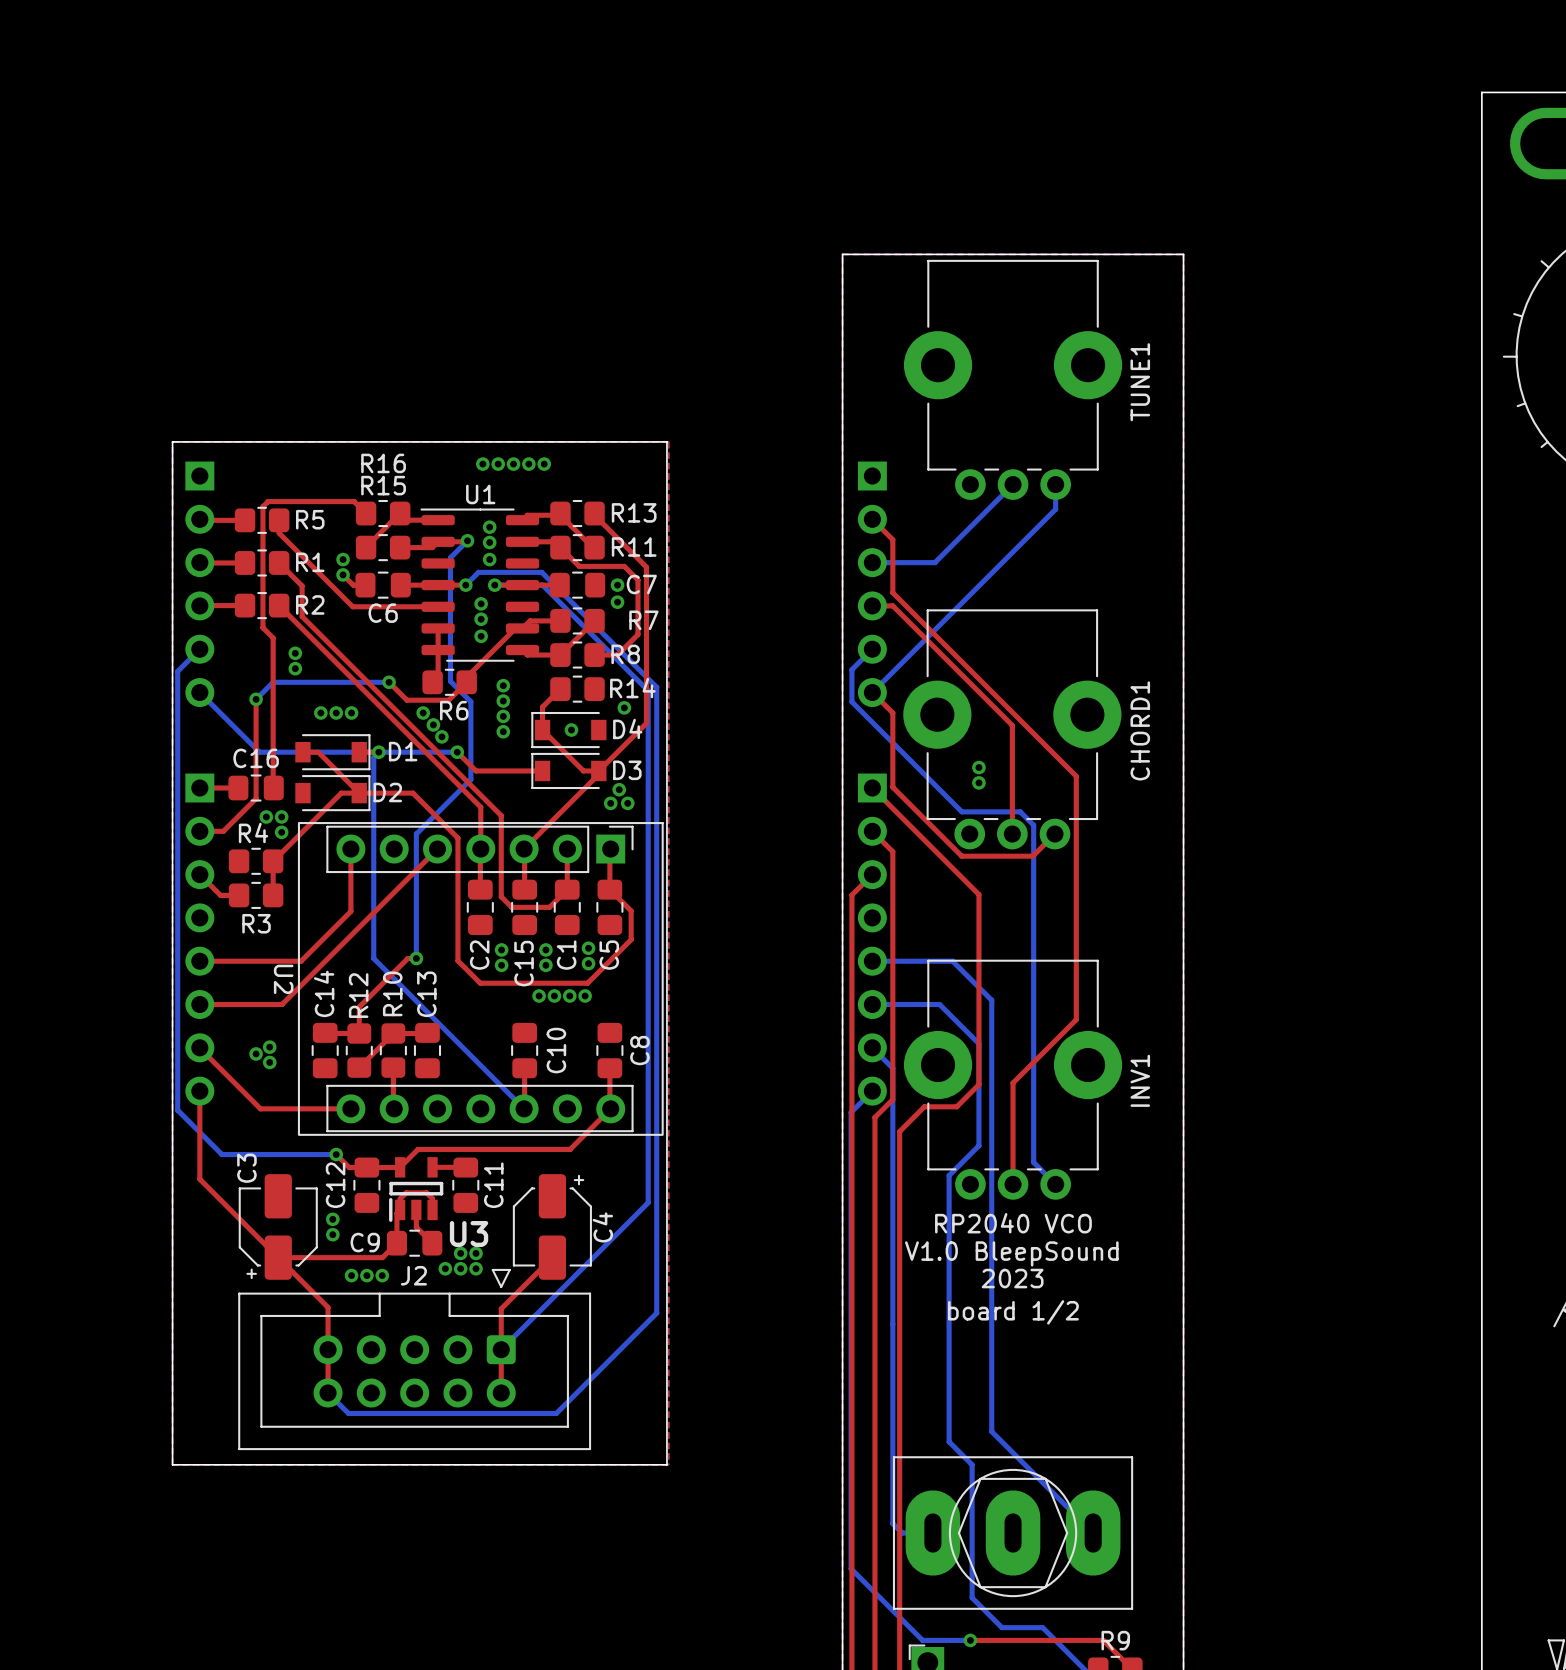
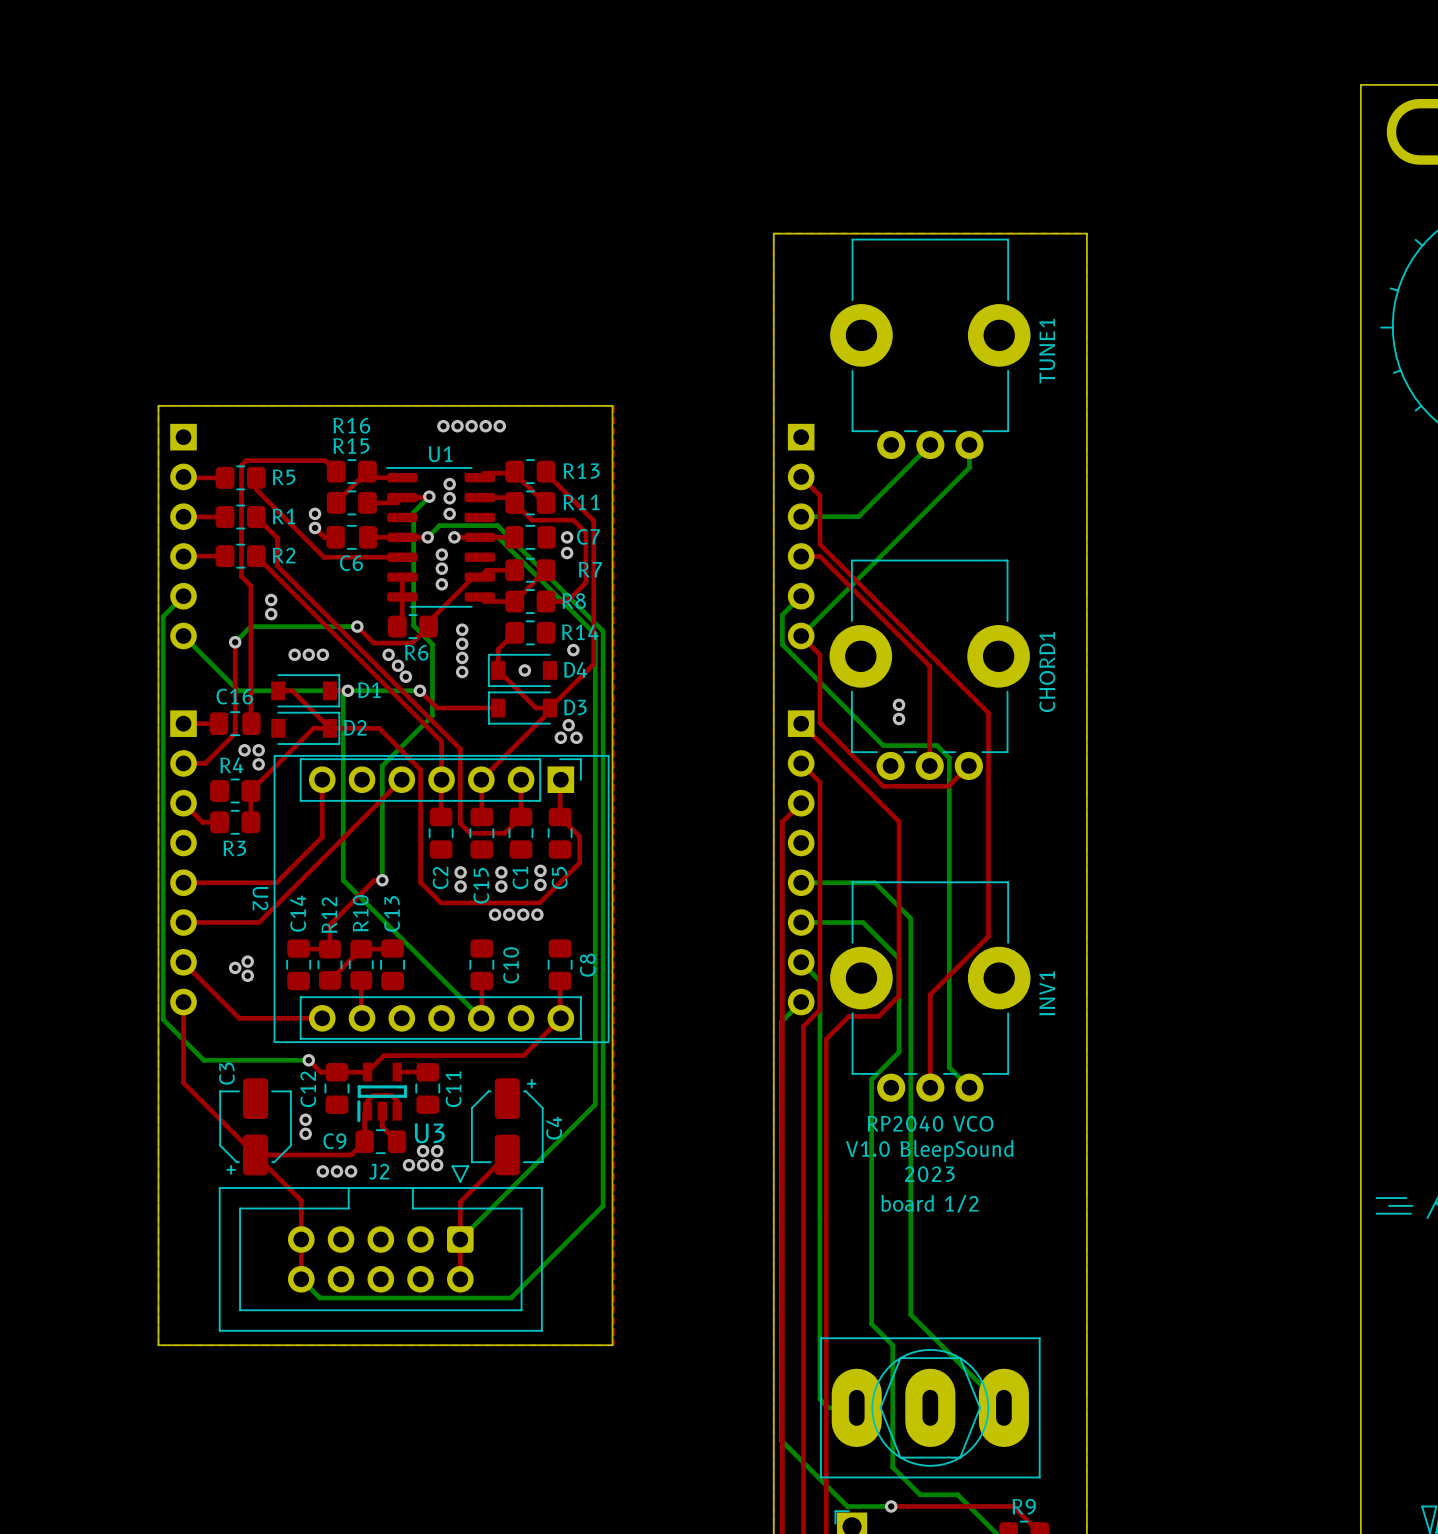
line: none -> (1376, 1198) (1406, 1198)
line: none -> (1389, 1205) (1412, 1205)
line: none -> (1376, 1213) (1410, 1213)

